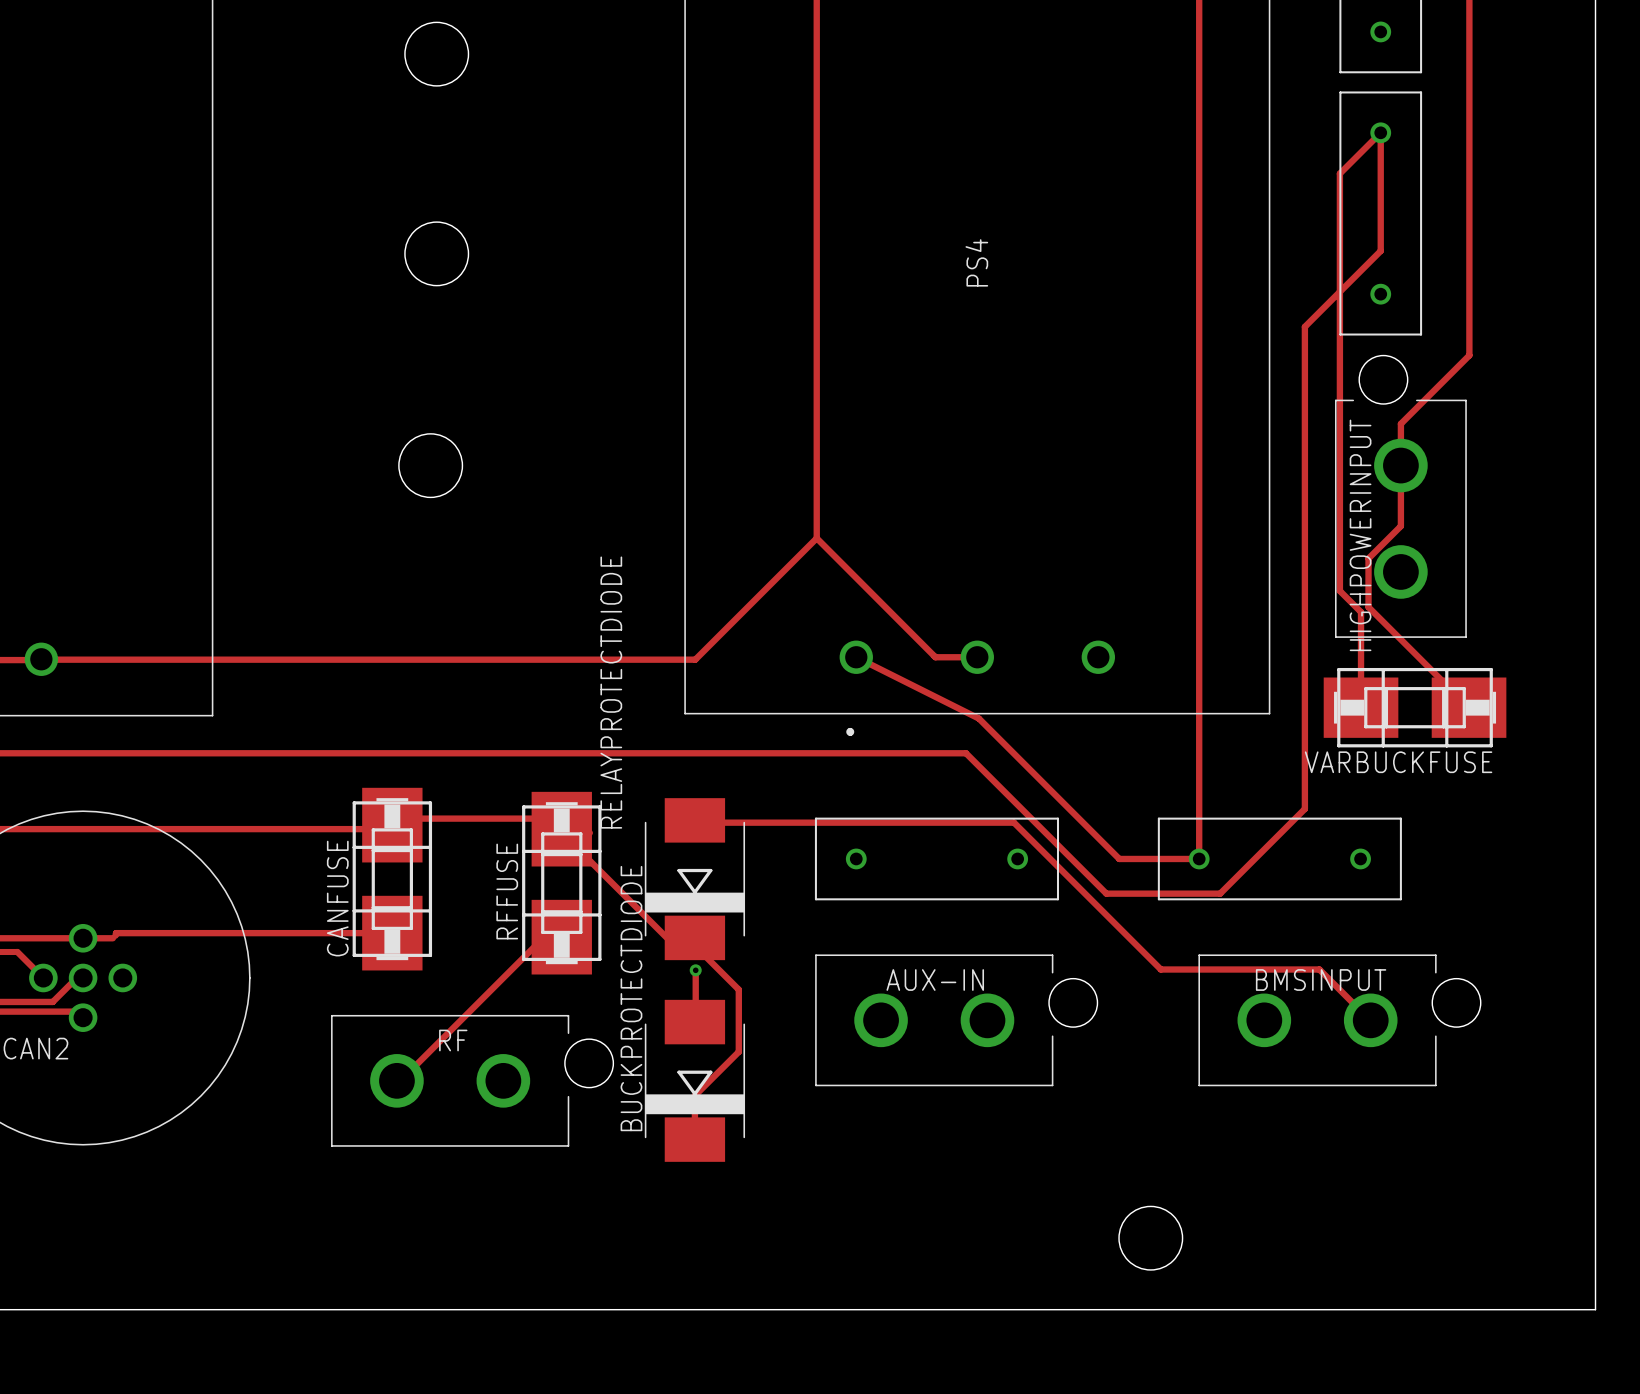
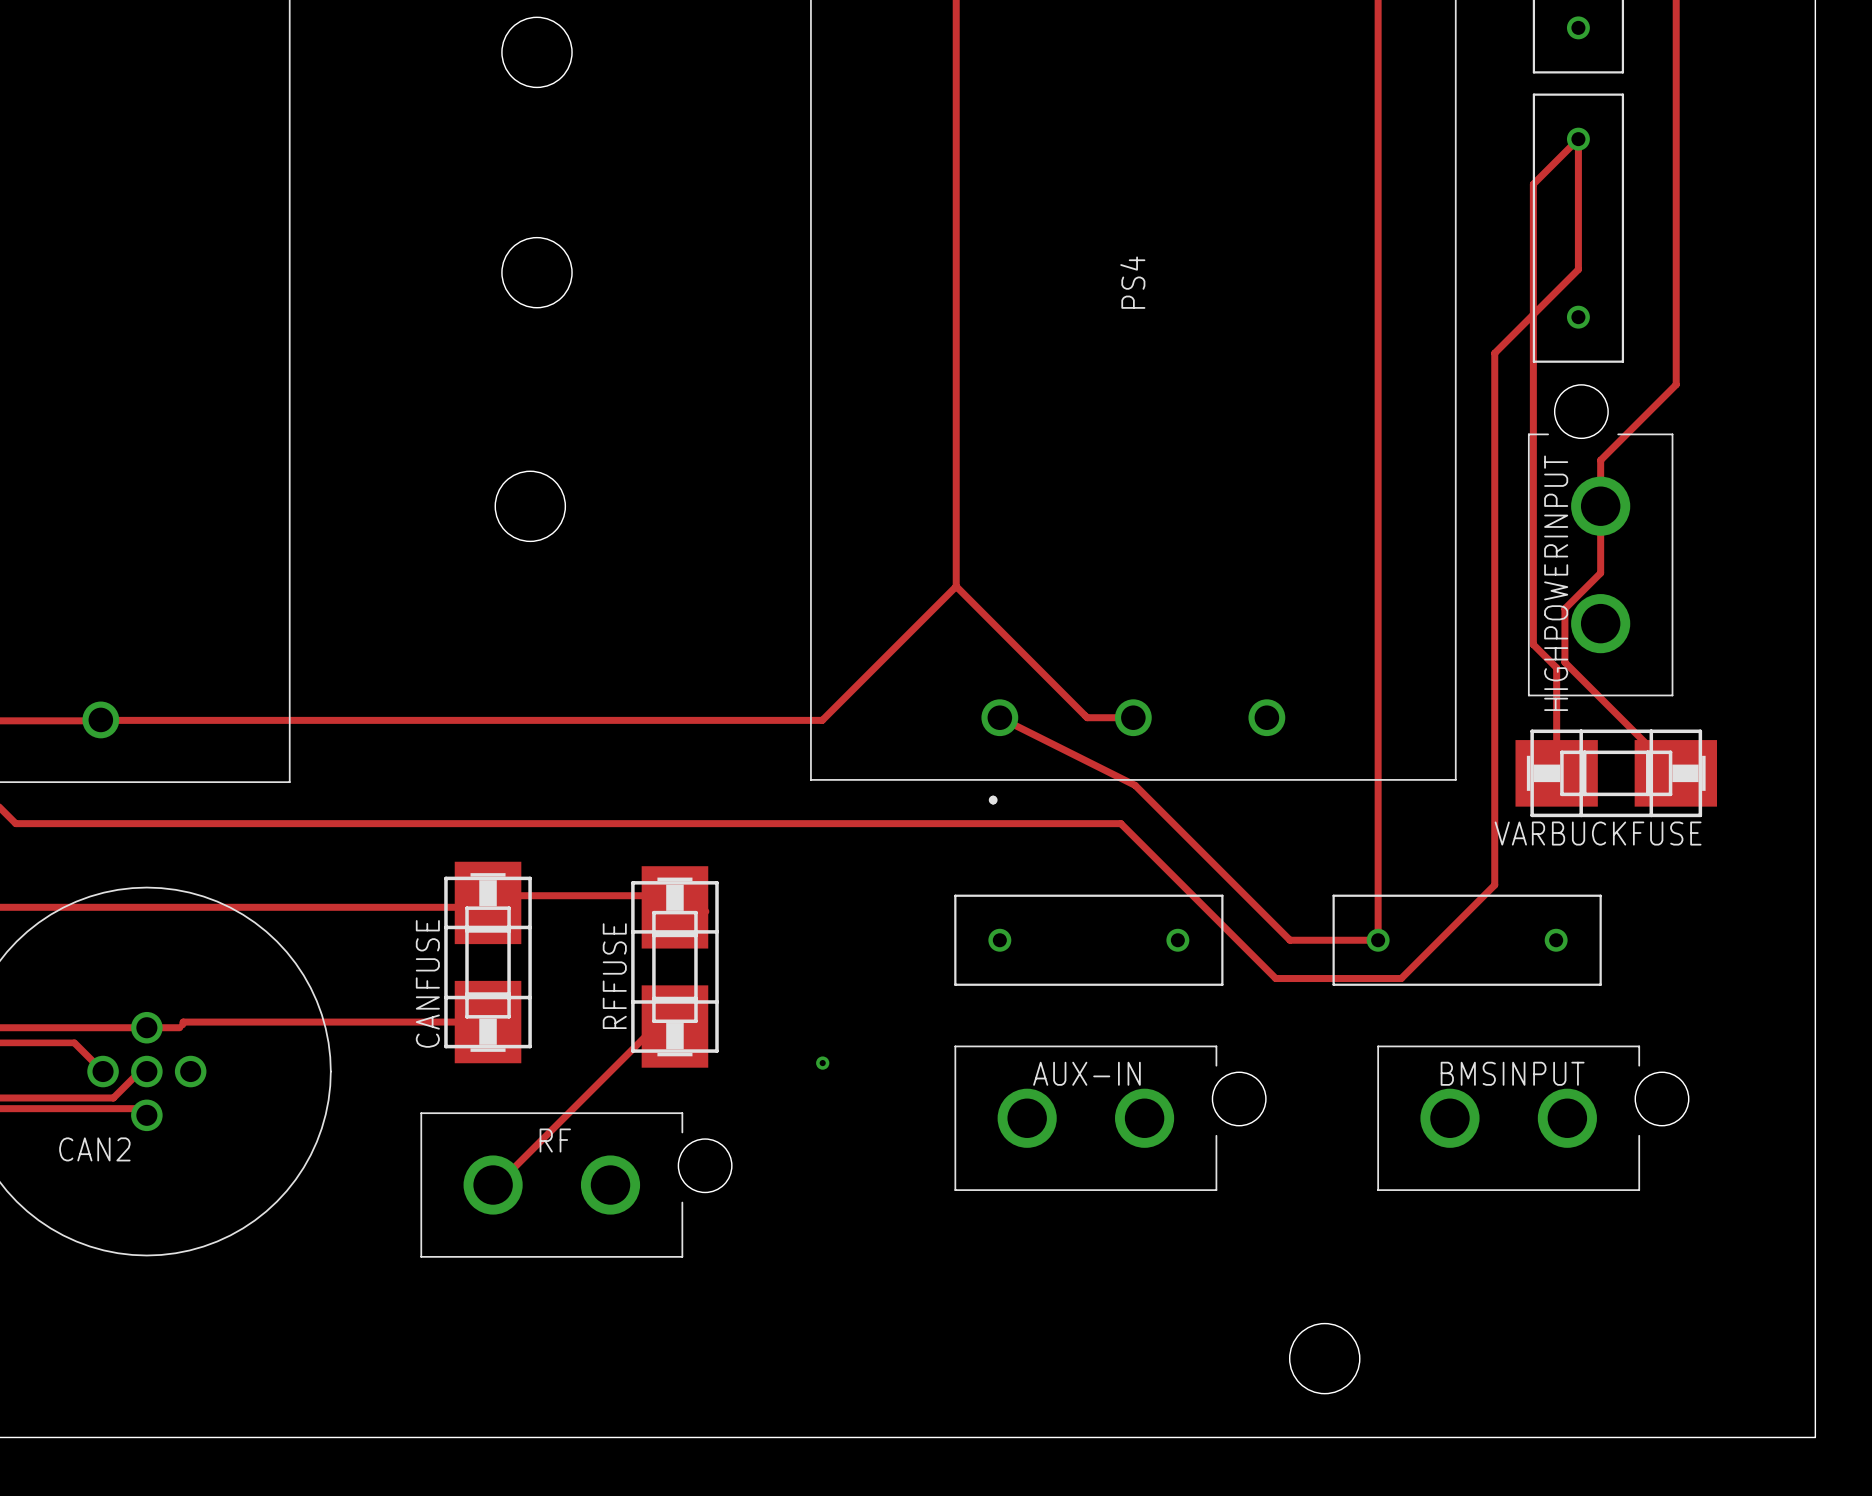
track: (694, 820) (695, 822) (1014, 822) (1160, 969) (1319, 969) (1370, 1020) -> none
track: (559, 830) (666, 937) (694, 937) (694, 945) (738, 989) (738, 1051) (694, 1095) (694, 1139) -> none
RELAYPROTECTDIODE: (694, 879) -> none
track: (695, 970) (694, 1022) -> none
BUCKPROTECTDIODE: (694, 1080) -> none

